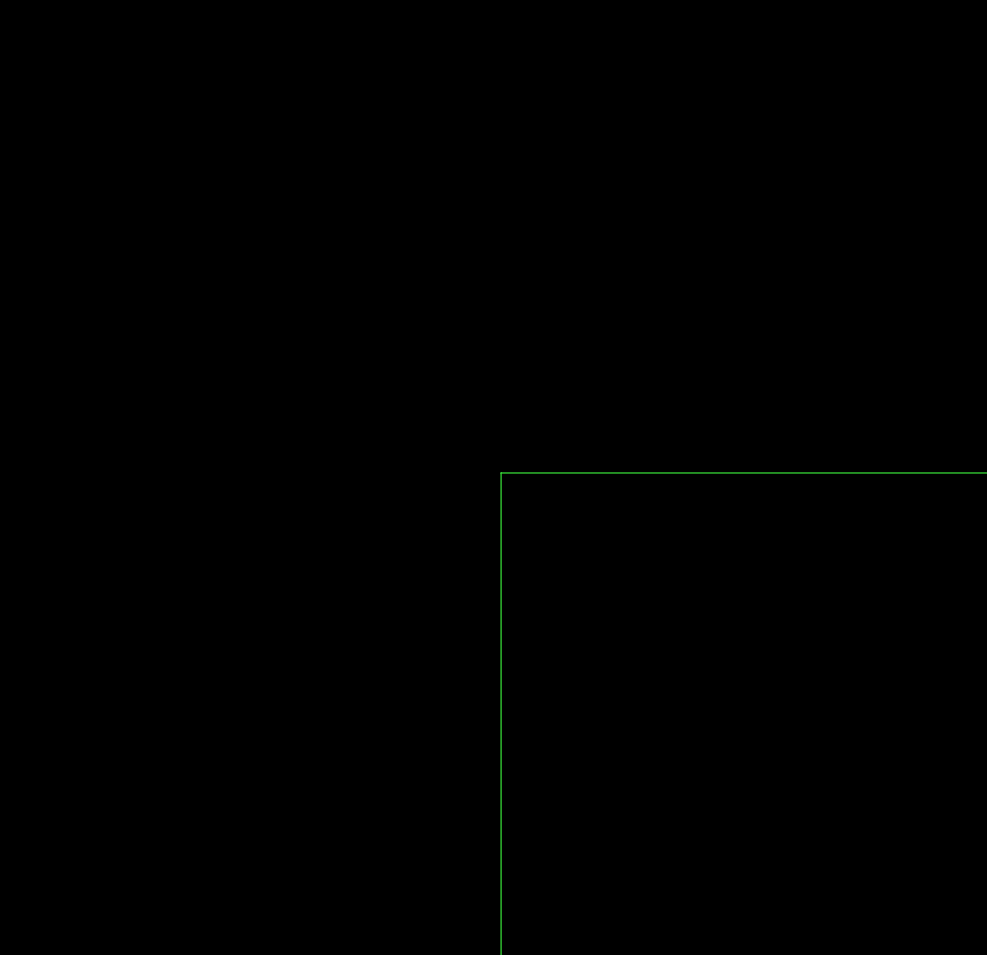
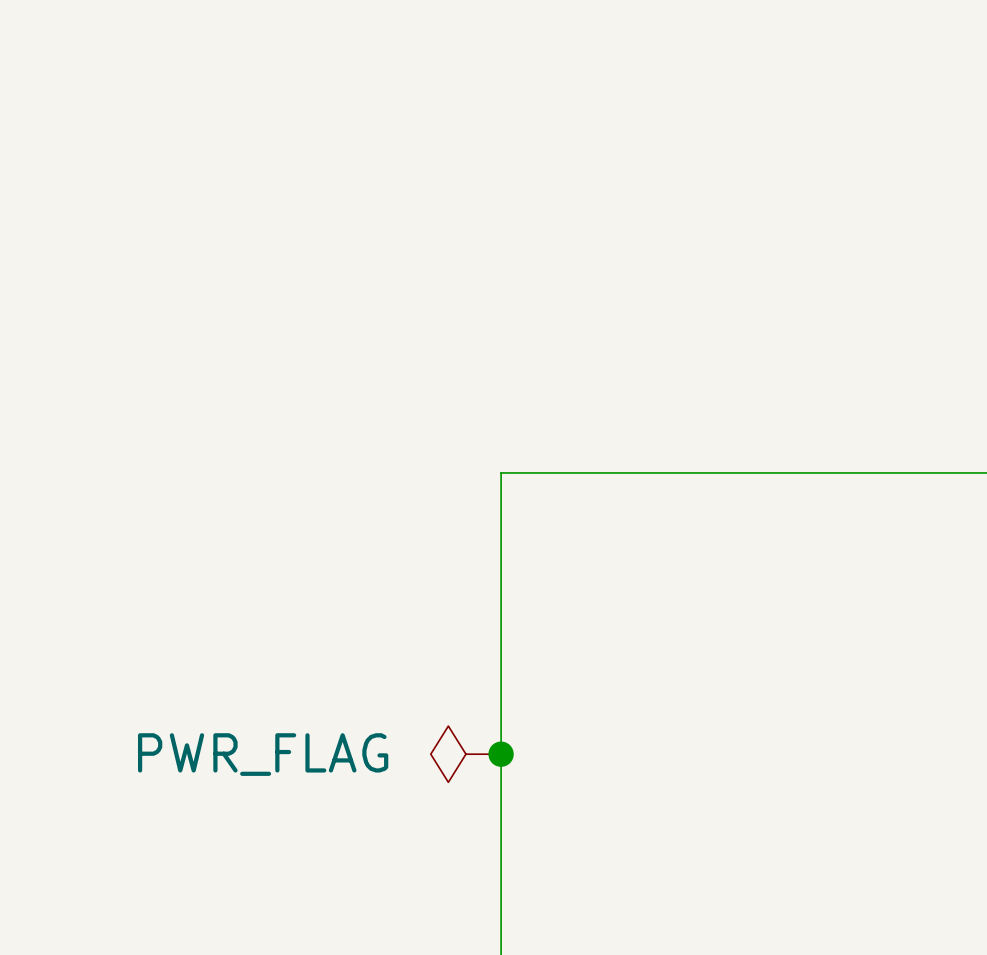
power symbol: none -> PWR_FLAG (465, 754)
junction: none -> (501, 754)

